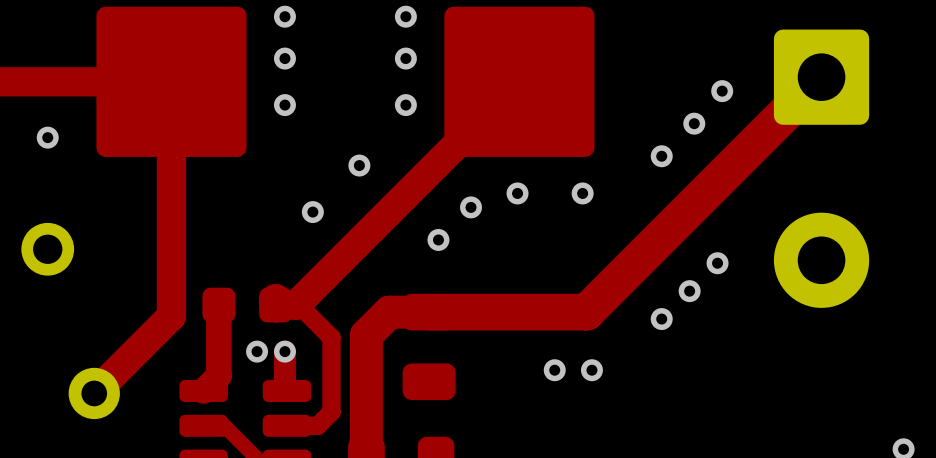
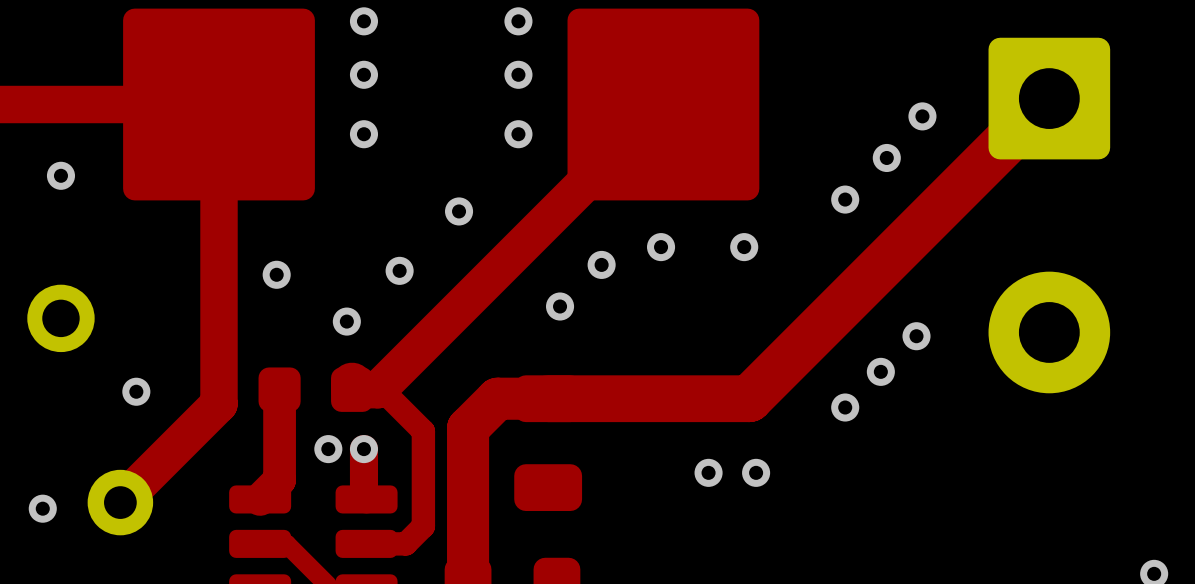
via: none -> (276, 274)
via: none -> (346, 321)
via: none -> (136, 391)
via: none -> (42, 508)

